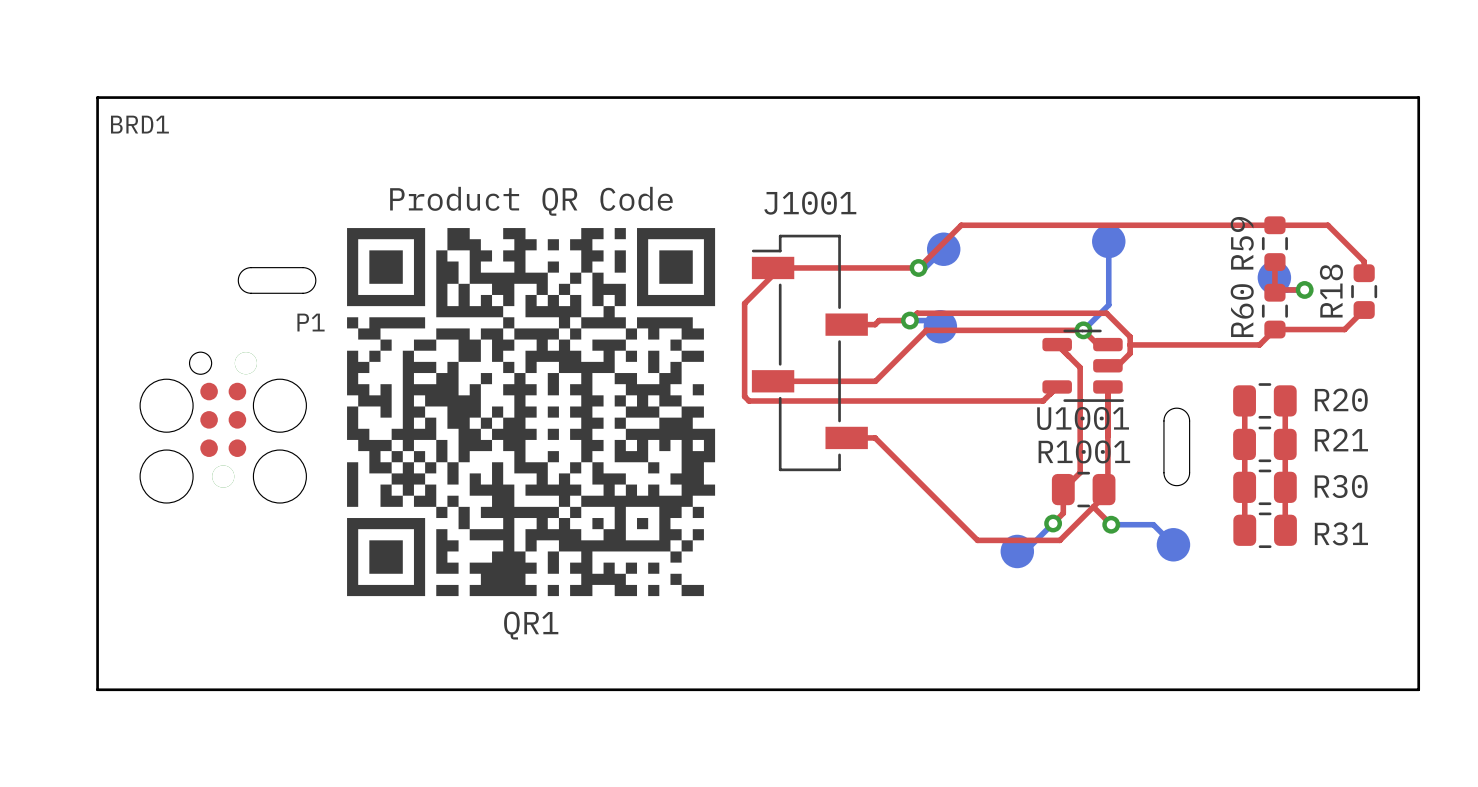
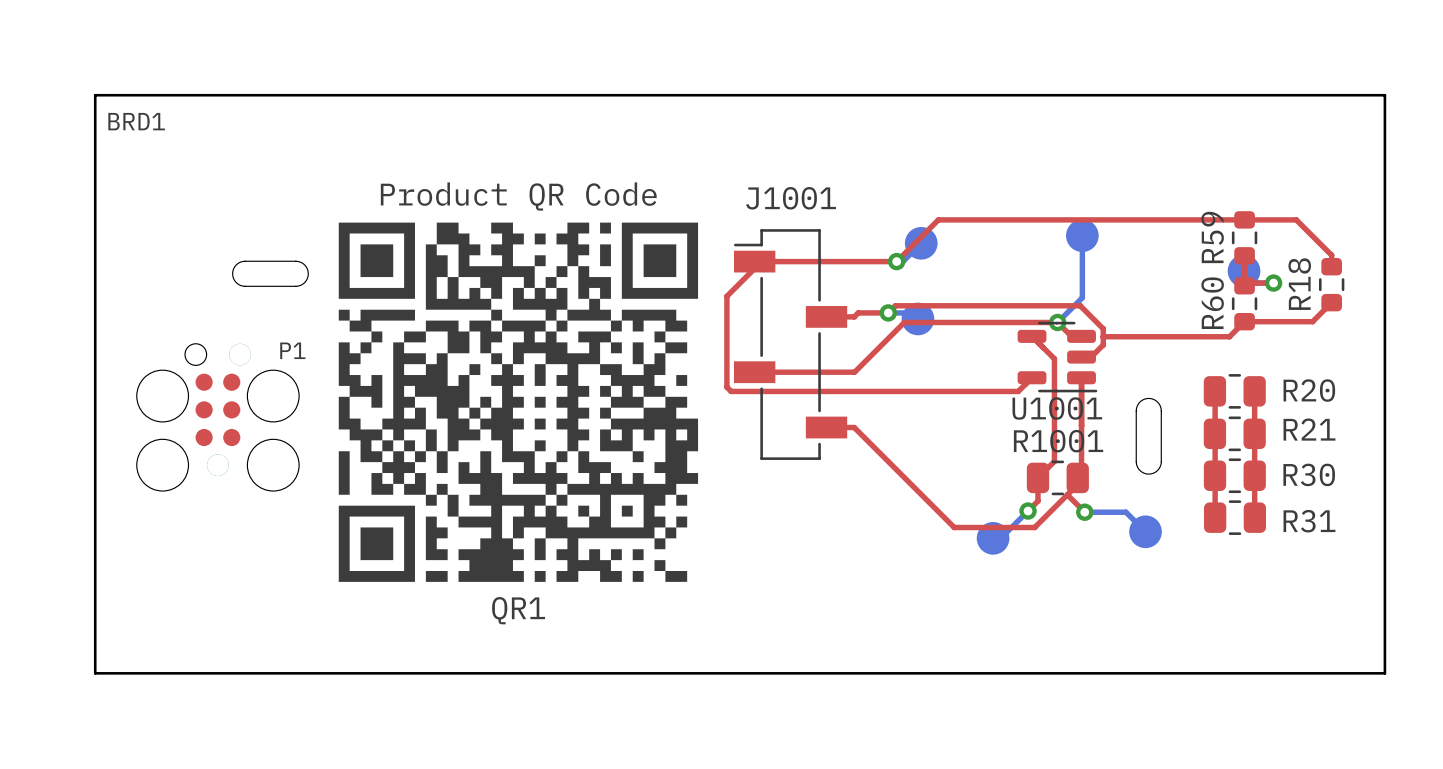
P1 name position: P1 (311, 322) -> P1 (292, 350)

